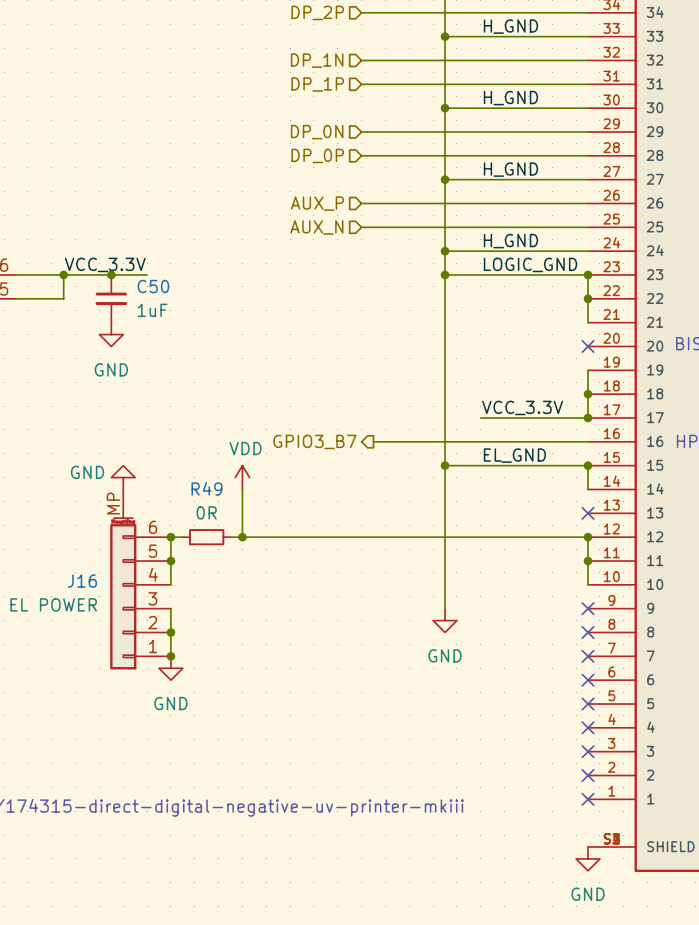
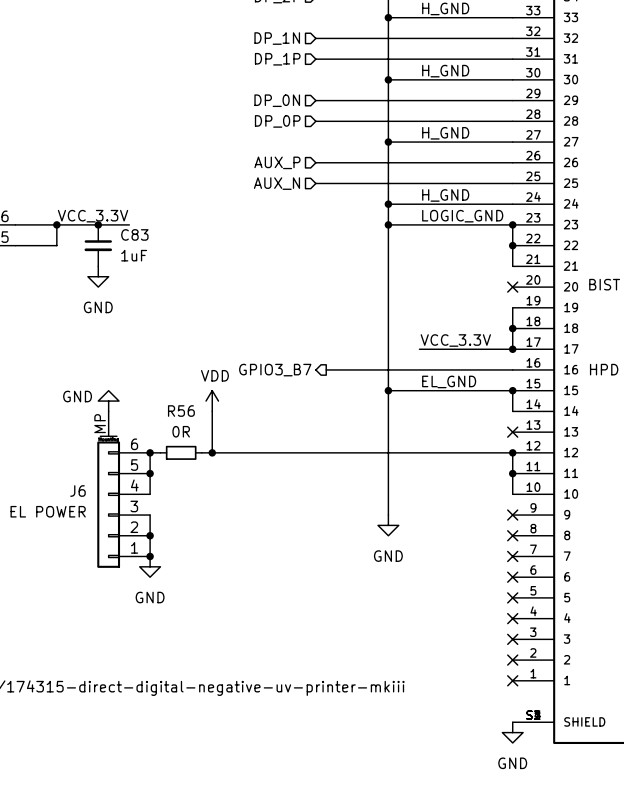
C50 name: C50 (153, 286) -> C83 (134, 234)
R49 name: R49 (206, 488) -> R56 (181, 411)
J16 name: J16 (82, 581) -> J6 (77, 491)

